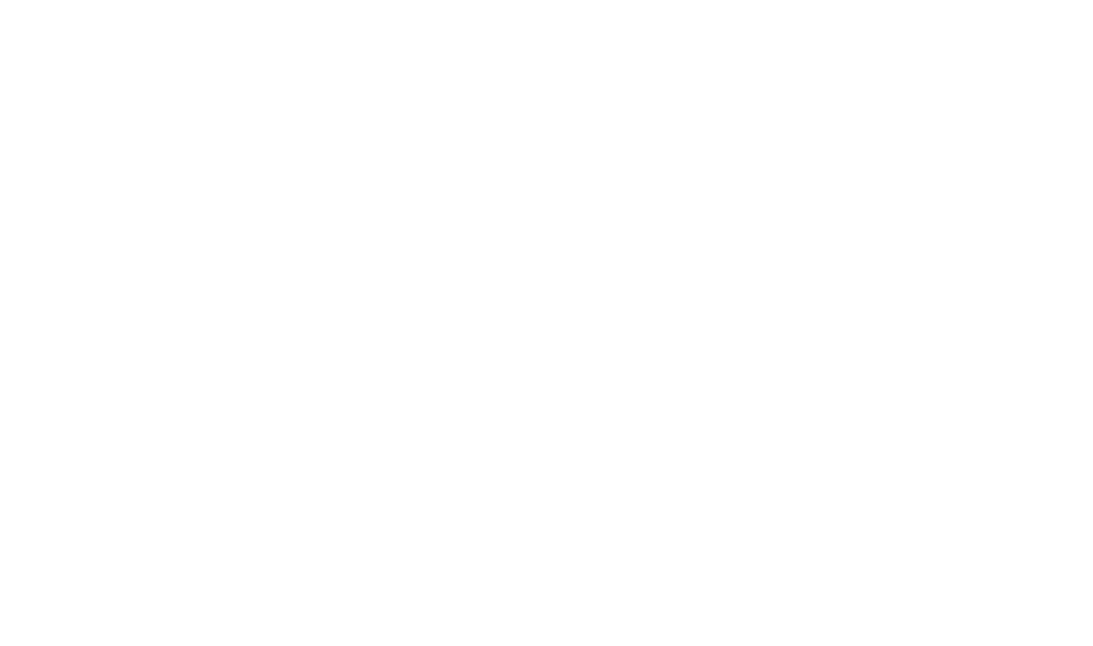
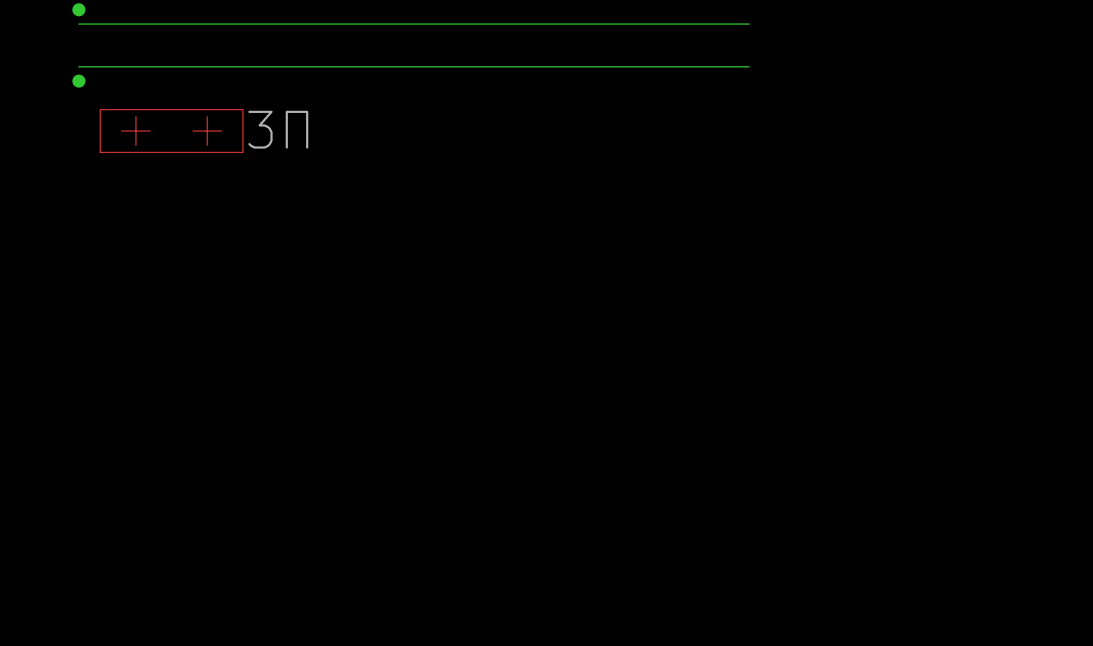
junction: none -> (78, 9)
wire: none -> (78, 24) (749, 24)
wire: none -> (78, 66) (749, 66)
junction: none -> (78, 81)
part: none -> (171, 131)

